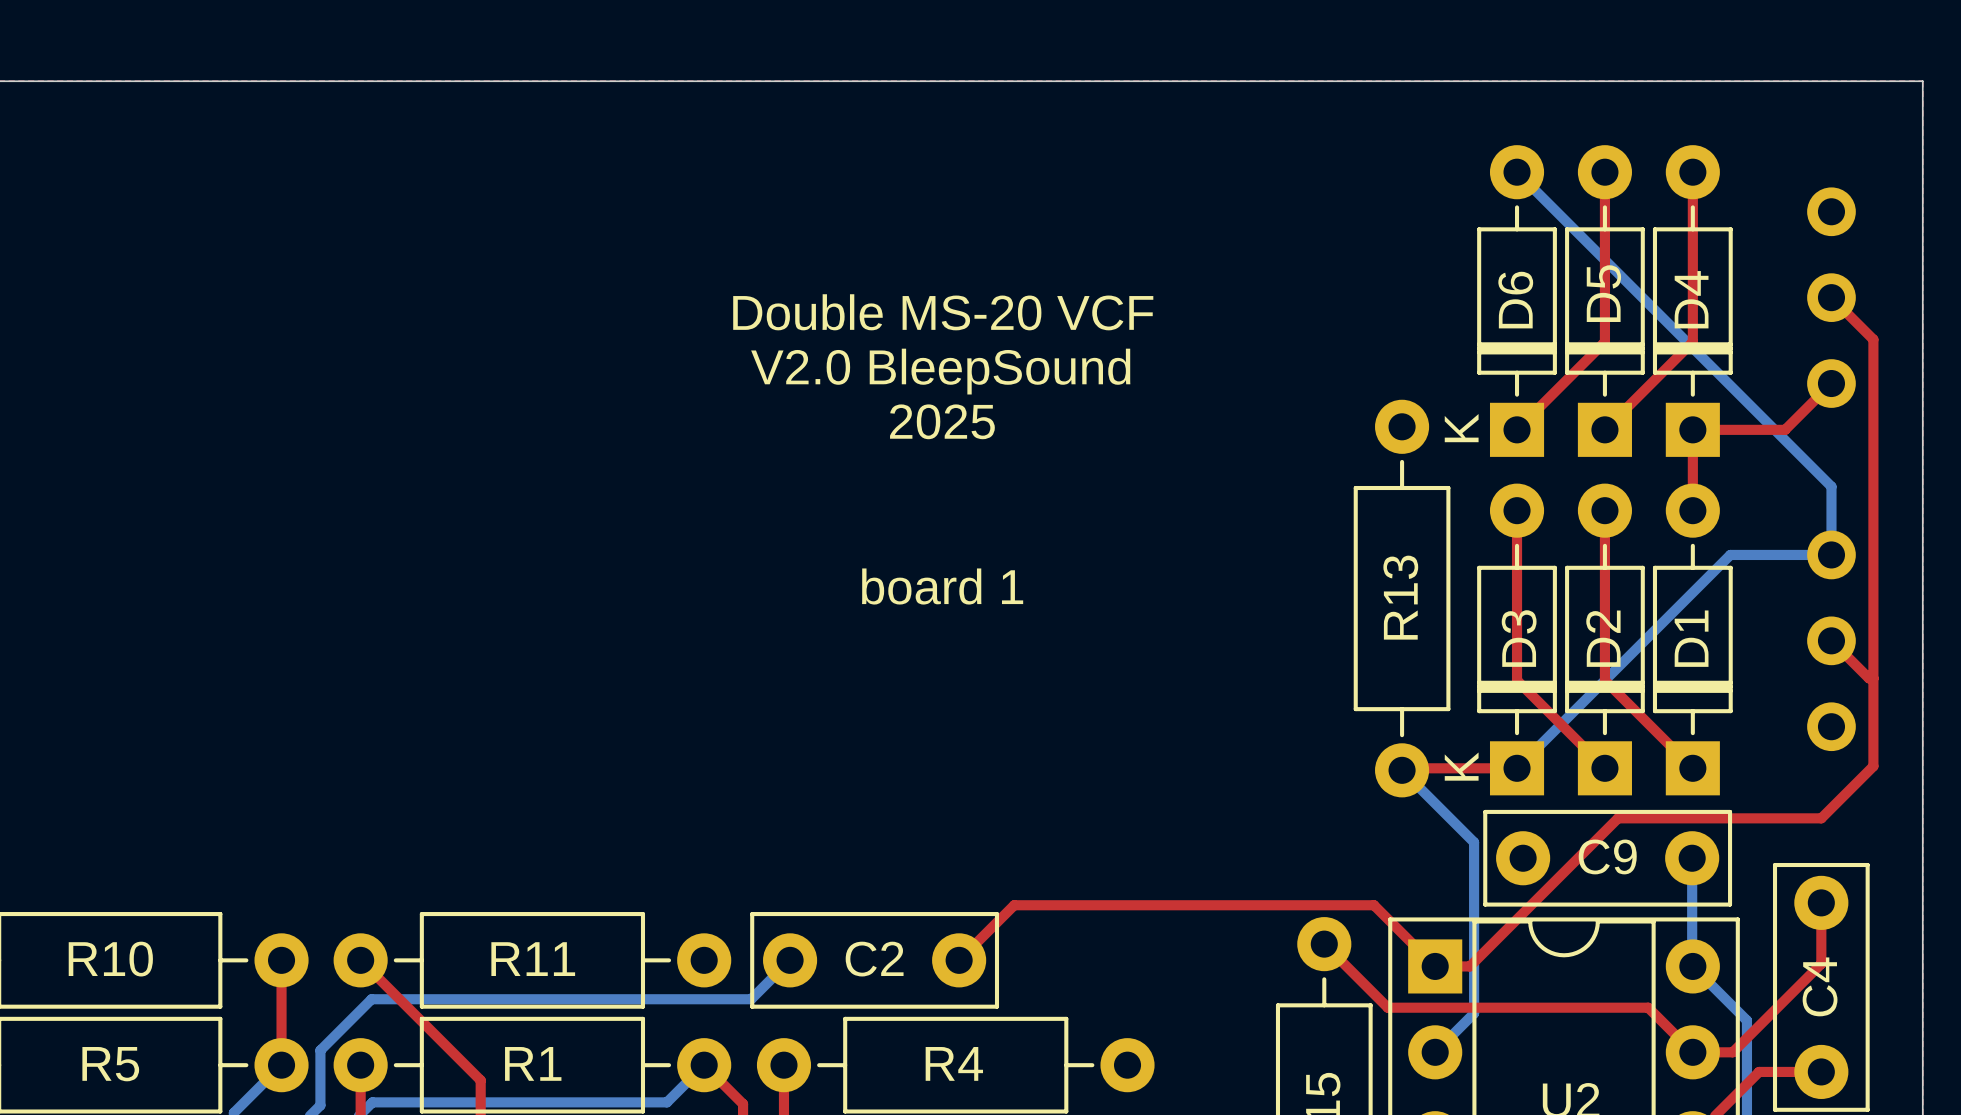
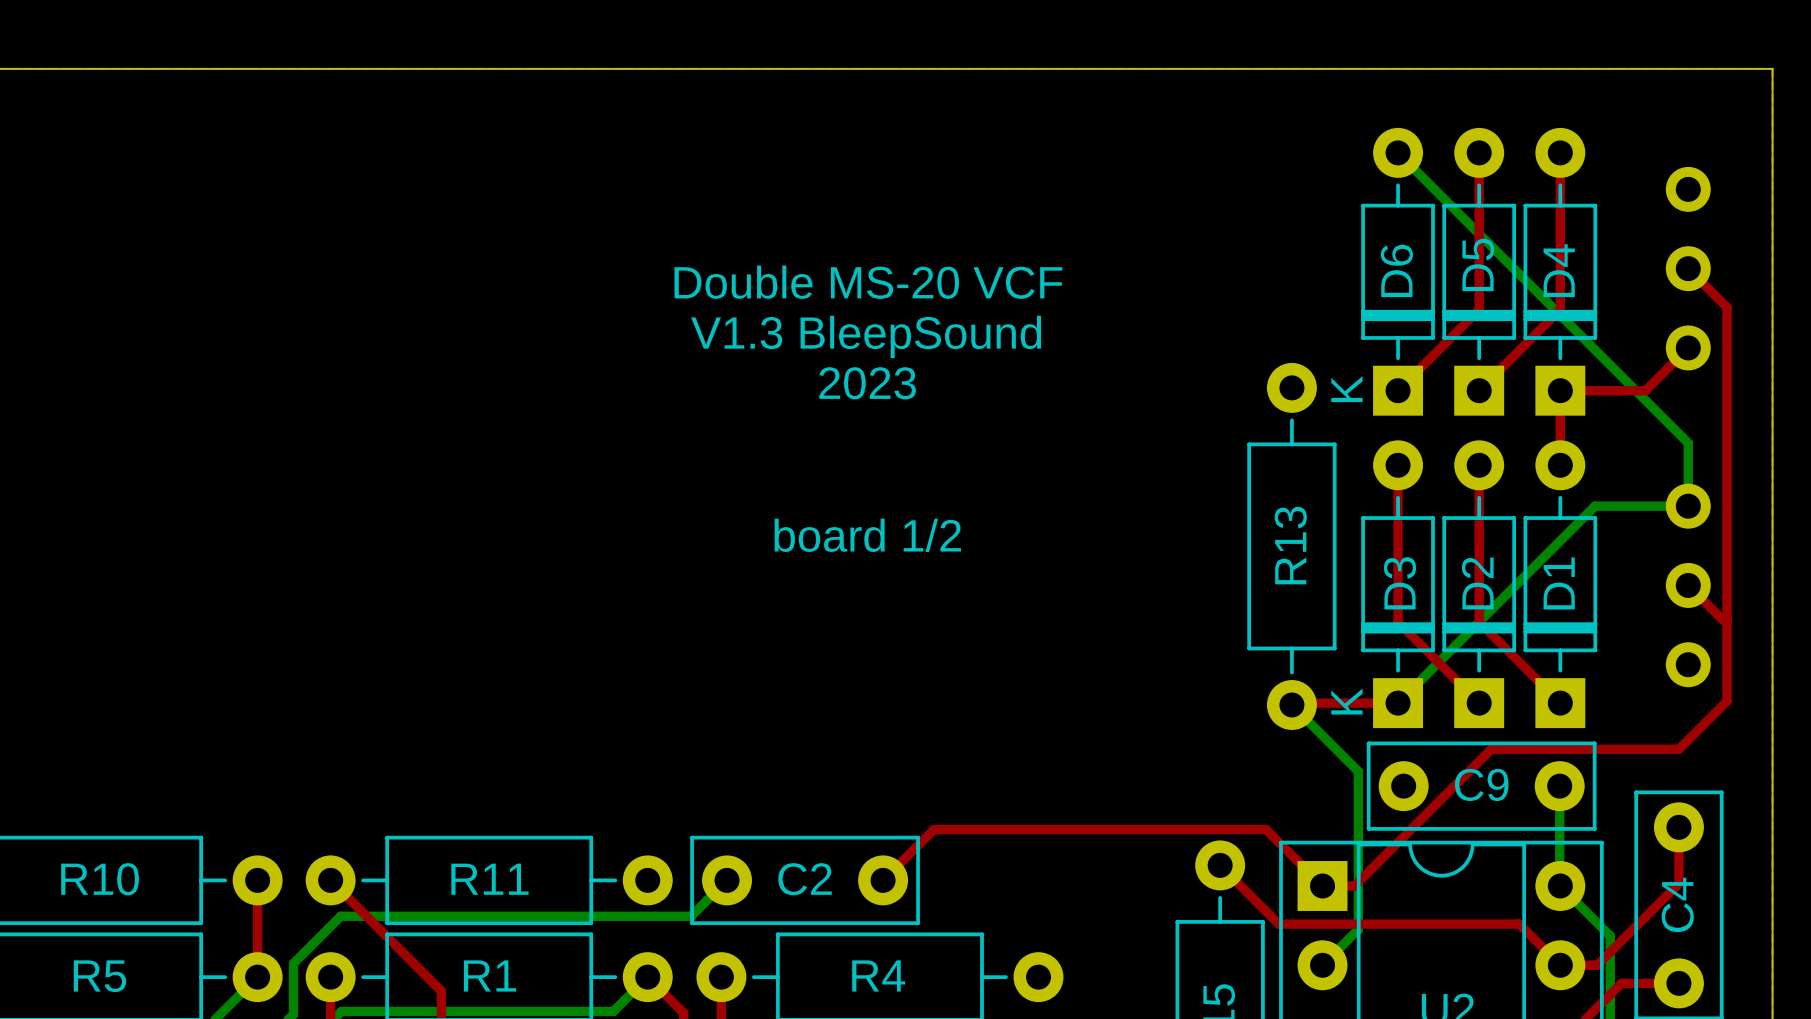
text: V2.0 BleepSound (940, 371) -> V1.3 BleepSound (866, 336)
text: 2025 (942, 421) -> 2023 (867, 383)
text: board 1 (942, 586) -> board 1/2 (867, 535)

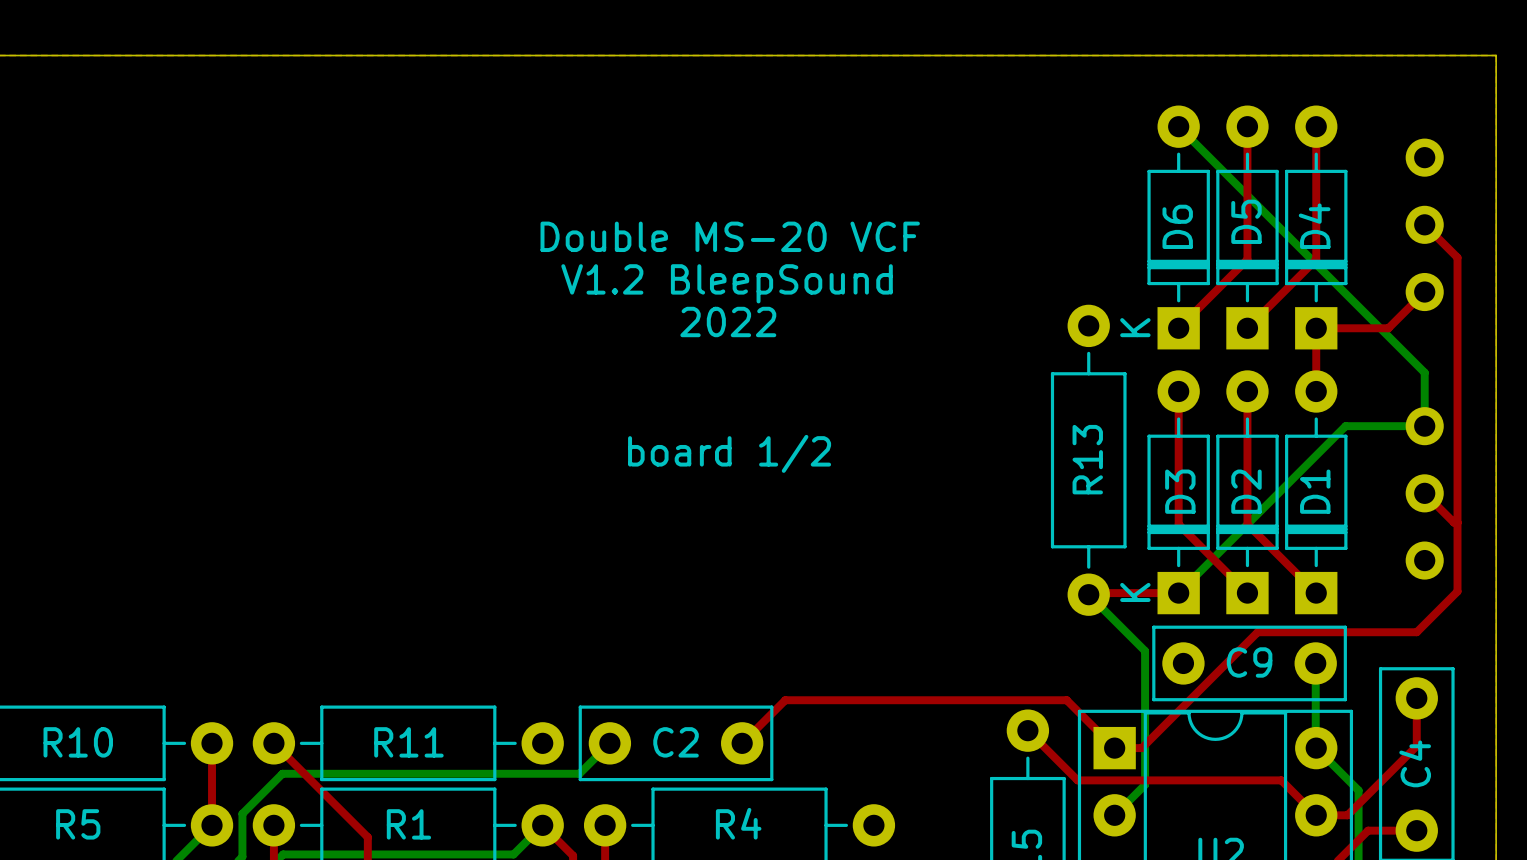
text: V1.3 BleepSound (866, 336) -> V1.2 BleepSound (727, 283)
text: 2023 (867, 383) -> 2022 (728, 321)

